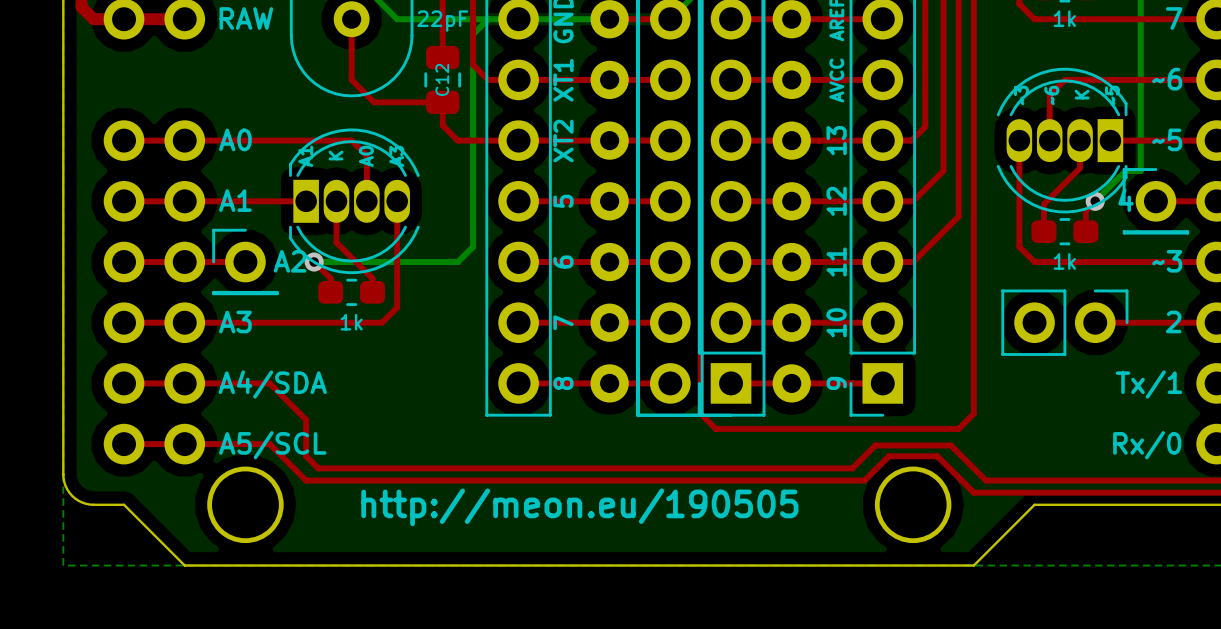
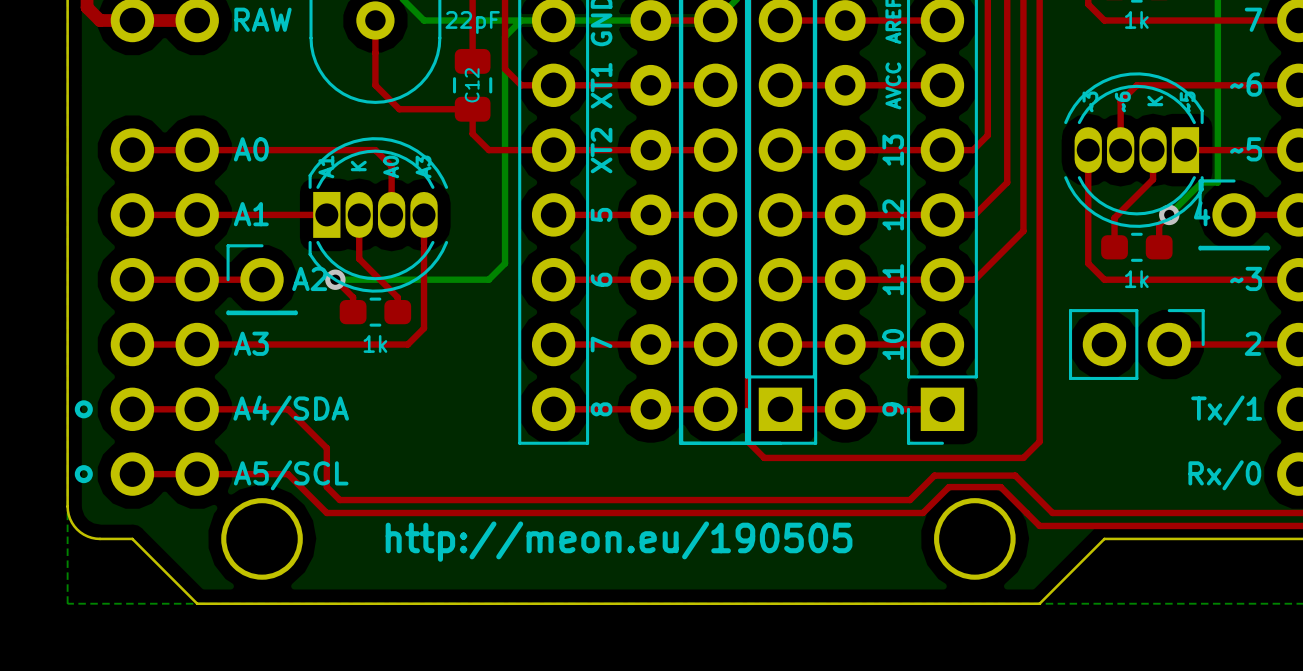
drawing: none -> [74, 400, 93, 419]
drawing: none -> [74, 465, 93, 484]

